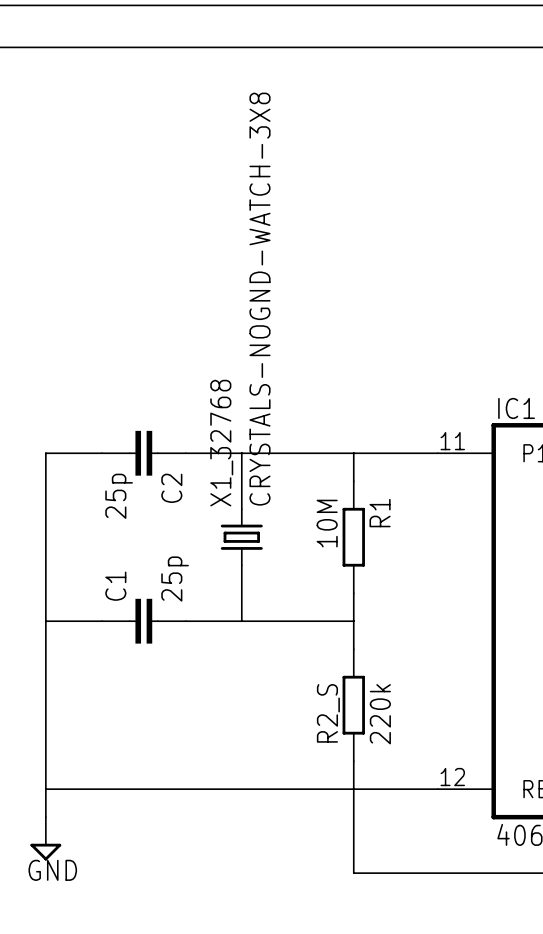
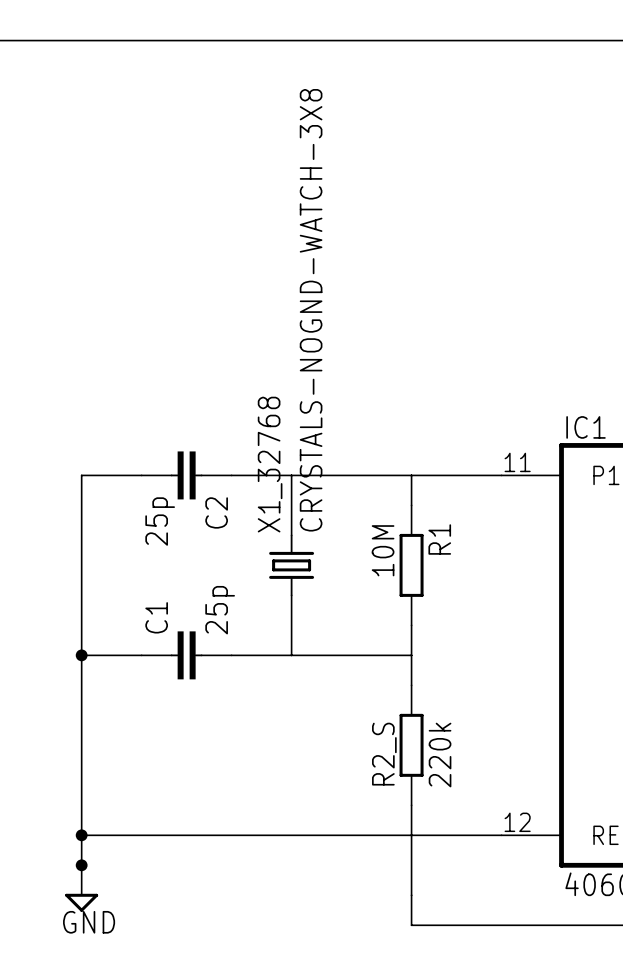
junction: none -> (81, 655)
junction: none -> (81, 835)
junction: none -> (81, 865)

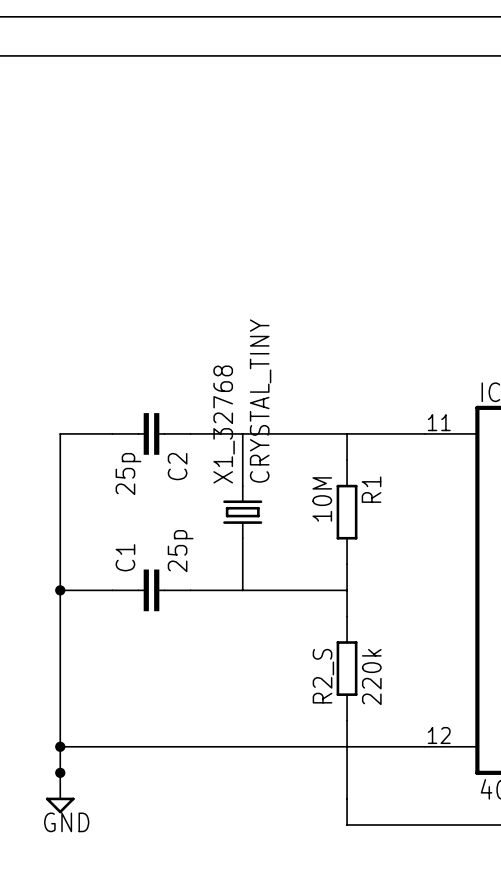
X1_32768 value: CRYSTALS-NOGND-WATCH-3X8 (311, 310) -> CRYSTAL_TINY (260, 401)

